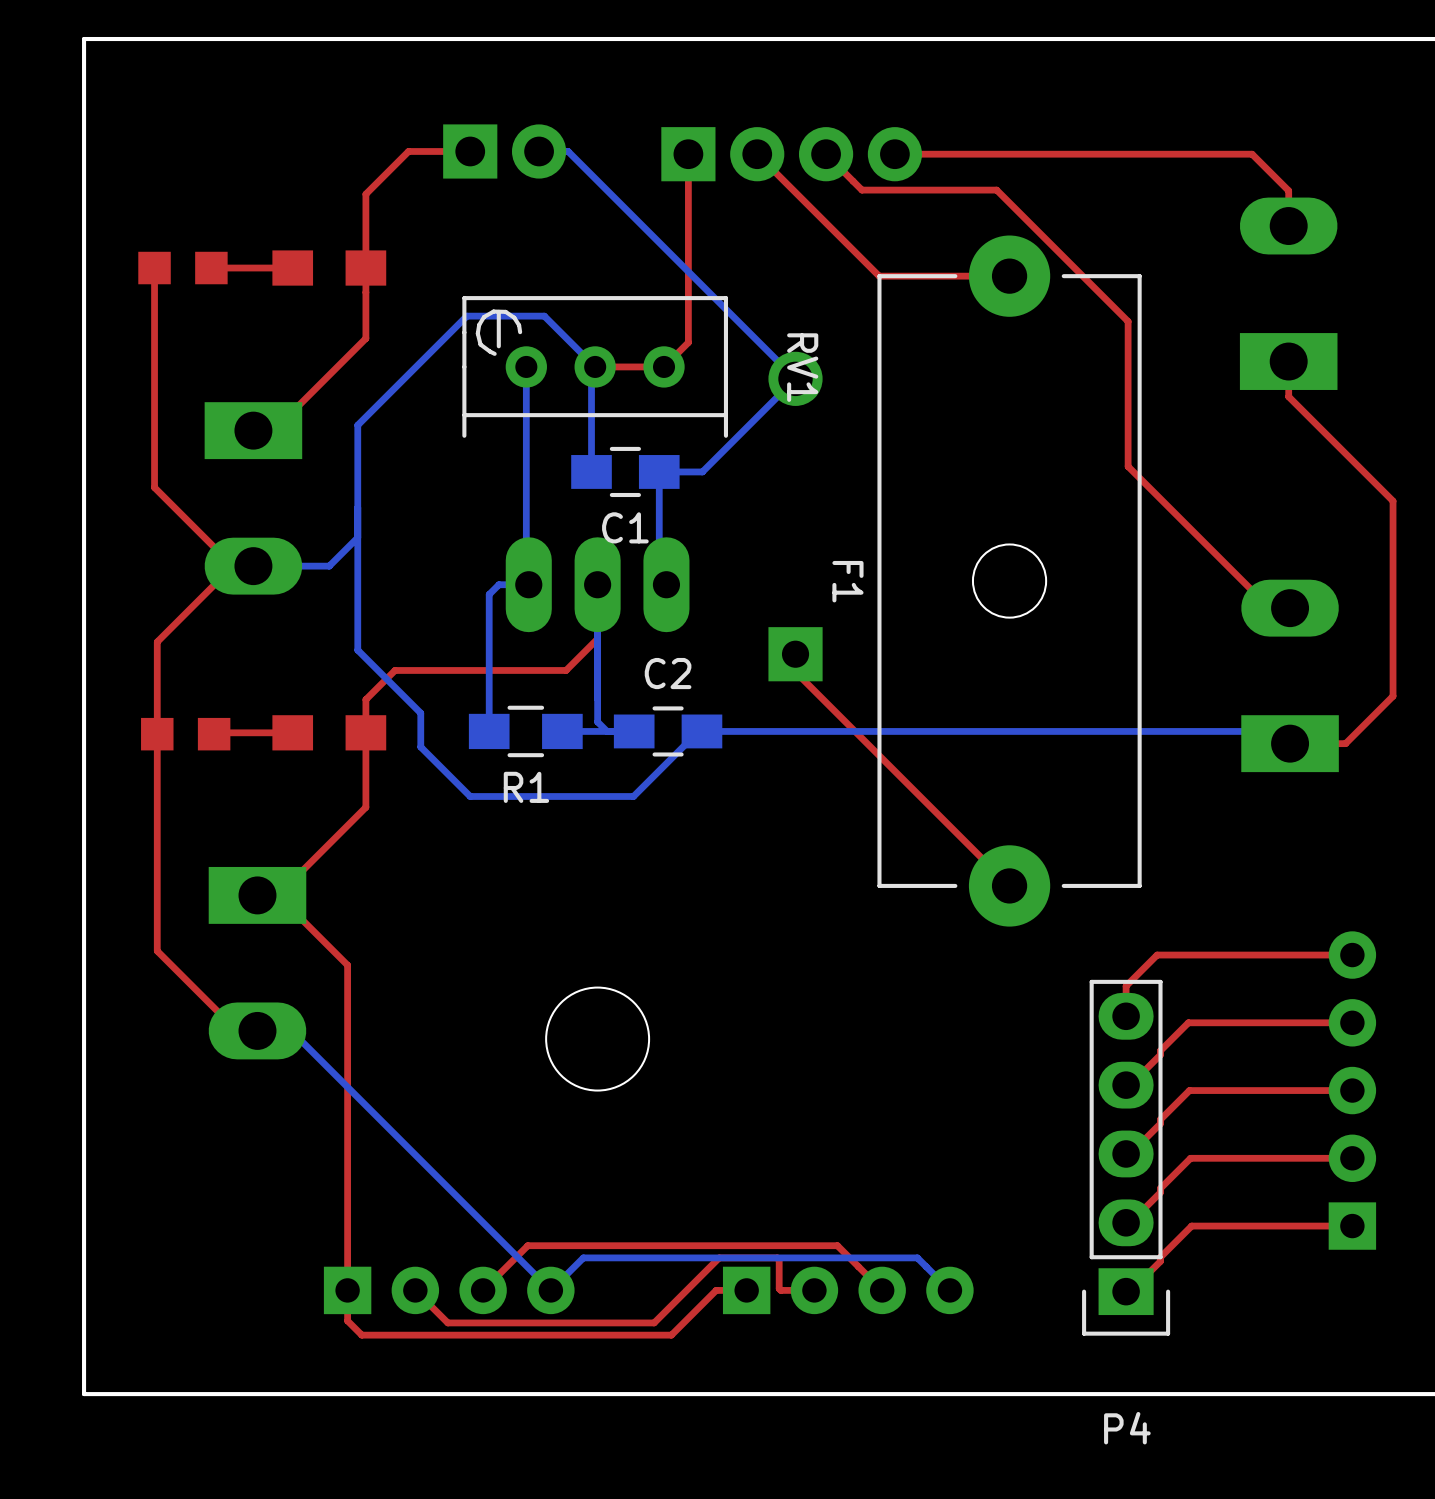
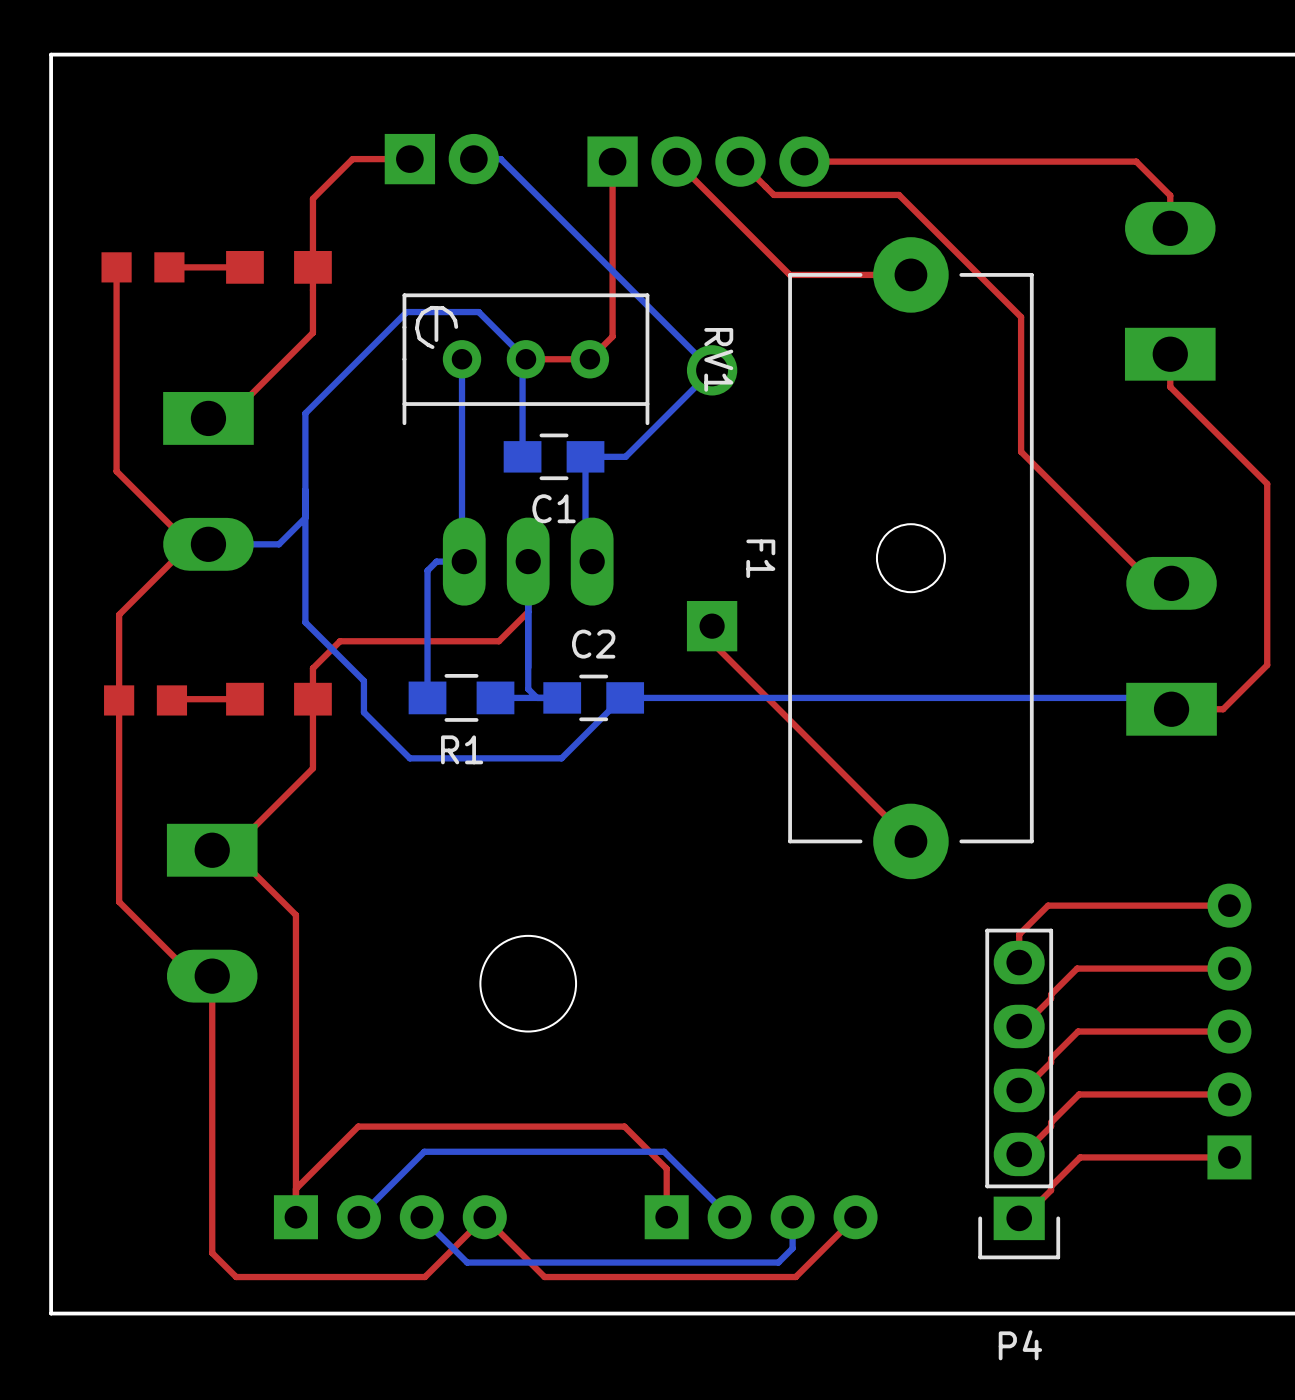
top track: none -> (212, 976) (212, 1253) (236, 1277) (424, 1277) (484, 1217) (544, 1277) (795, 1277) (855, 1217)
bottom track: (291, 1030) (550, 1290) (583, 1257) (917, 1257) (949, 1290) -> none
top track: (746, 1290) (716, 1290) (671, 1335) (361, 1335) (347, 1320) (347, 1290) -> (666, 1217) (666, 1168) (624, 1126) (358, 1126) (295, 1188)
bottom track: none -> (729, 1217) (664, 1151) (424, 1151) (358, 1217)
top track: (814, 1290) (780, 1290) (779, 1288) (779, 1259) (777, 1257) (719, 1257) (654, 1322) (447, 1322) (415, 1290) -> none
bottom track: none -> (792, 1217) (792, 1248) (778, 1262) (467, 1262) (421, 1217)
top track: (882, 1290) (837, 1245) (527, 1245) (483, 1290) -> none

